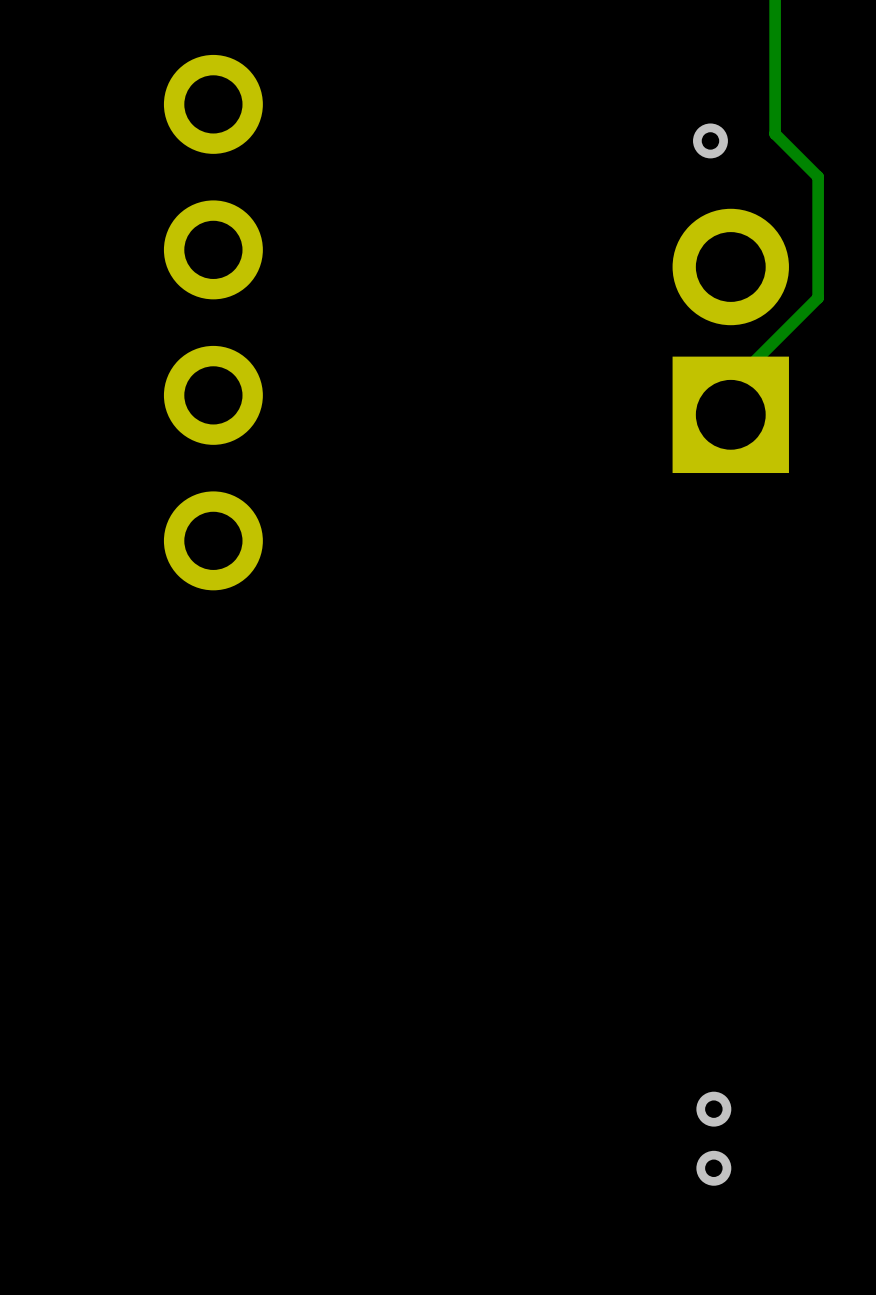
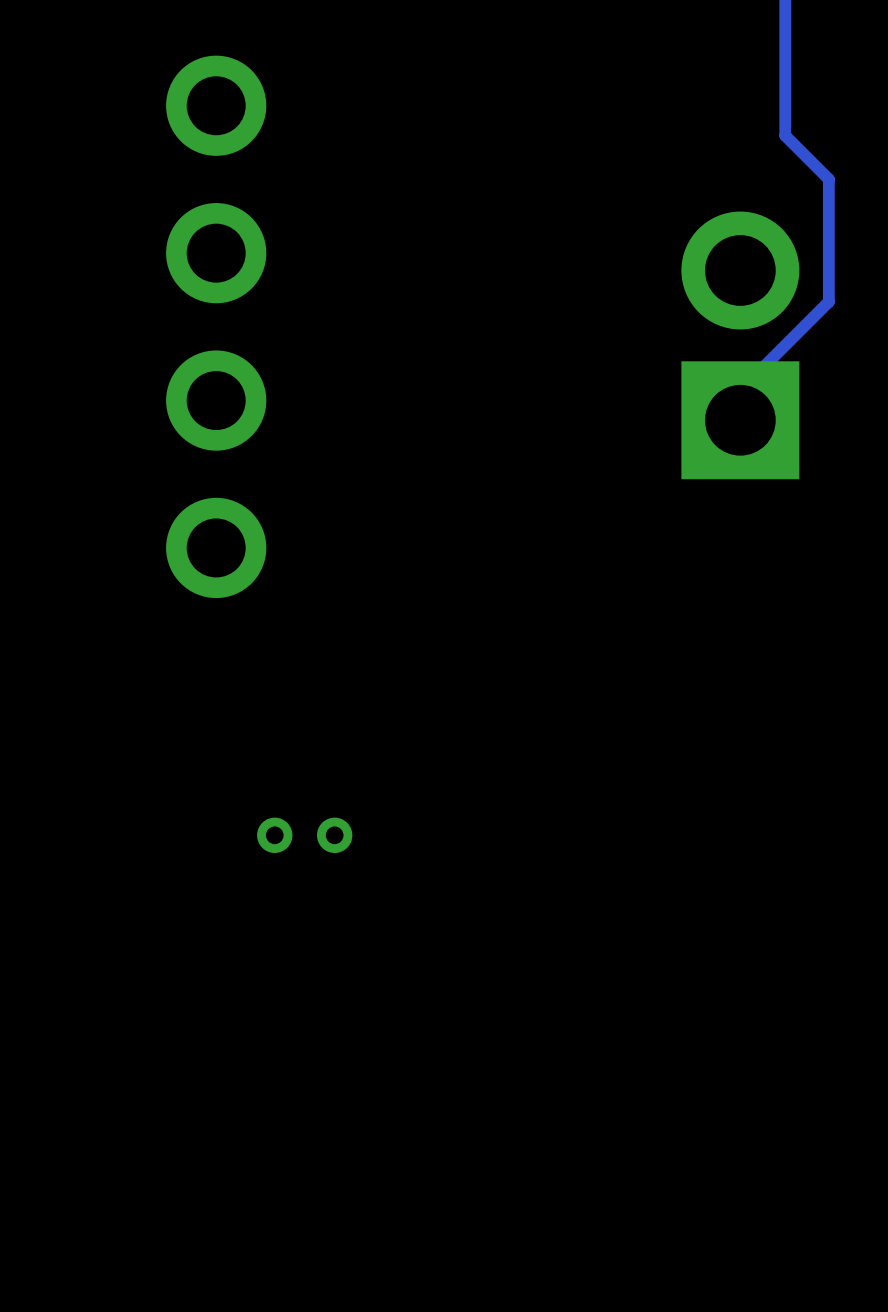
via: (710, 140) -> none
via: none -> (274, 835)
via: none -> (334, 835)
via: (713, 1109) -> none
via: (713, 1168) -> none

